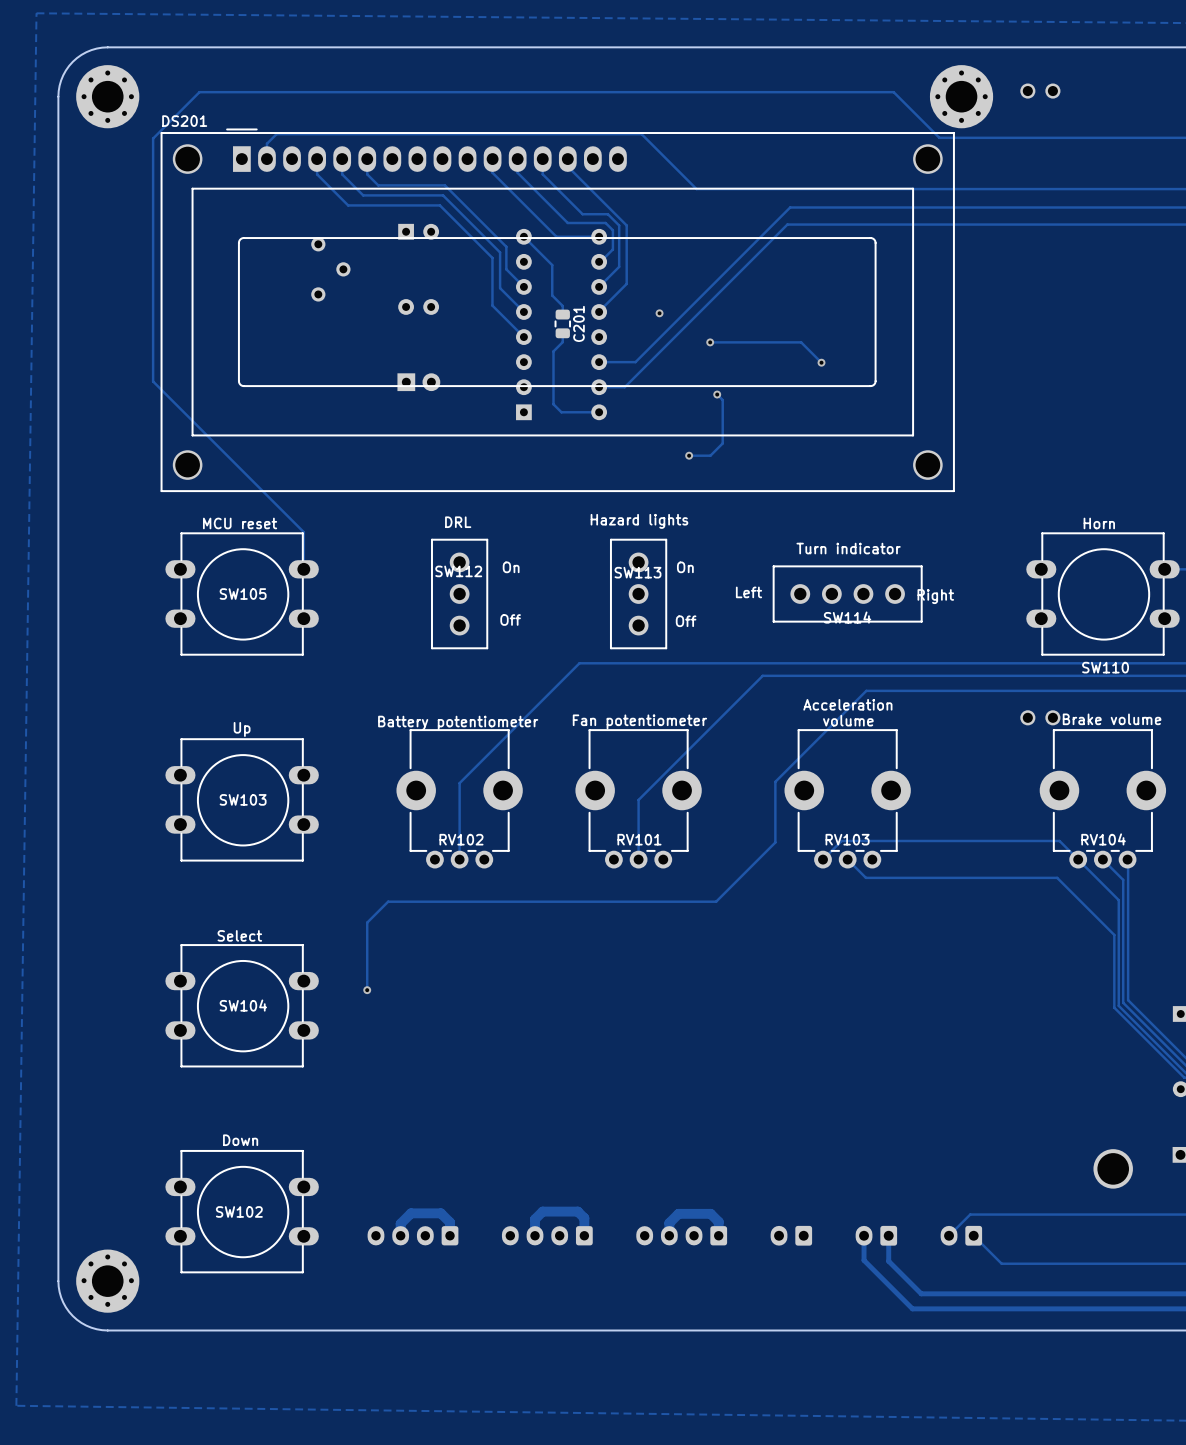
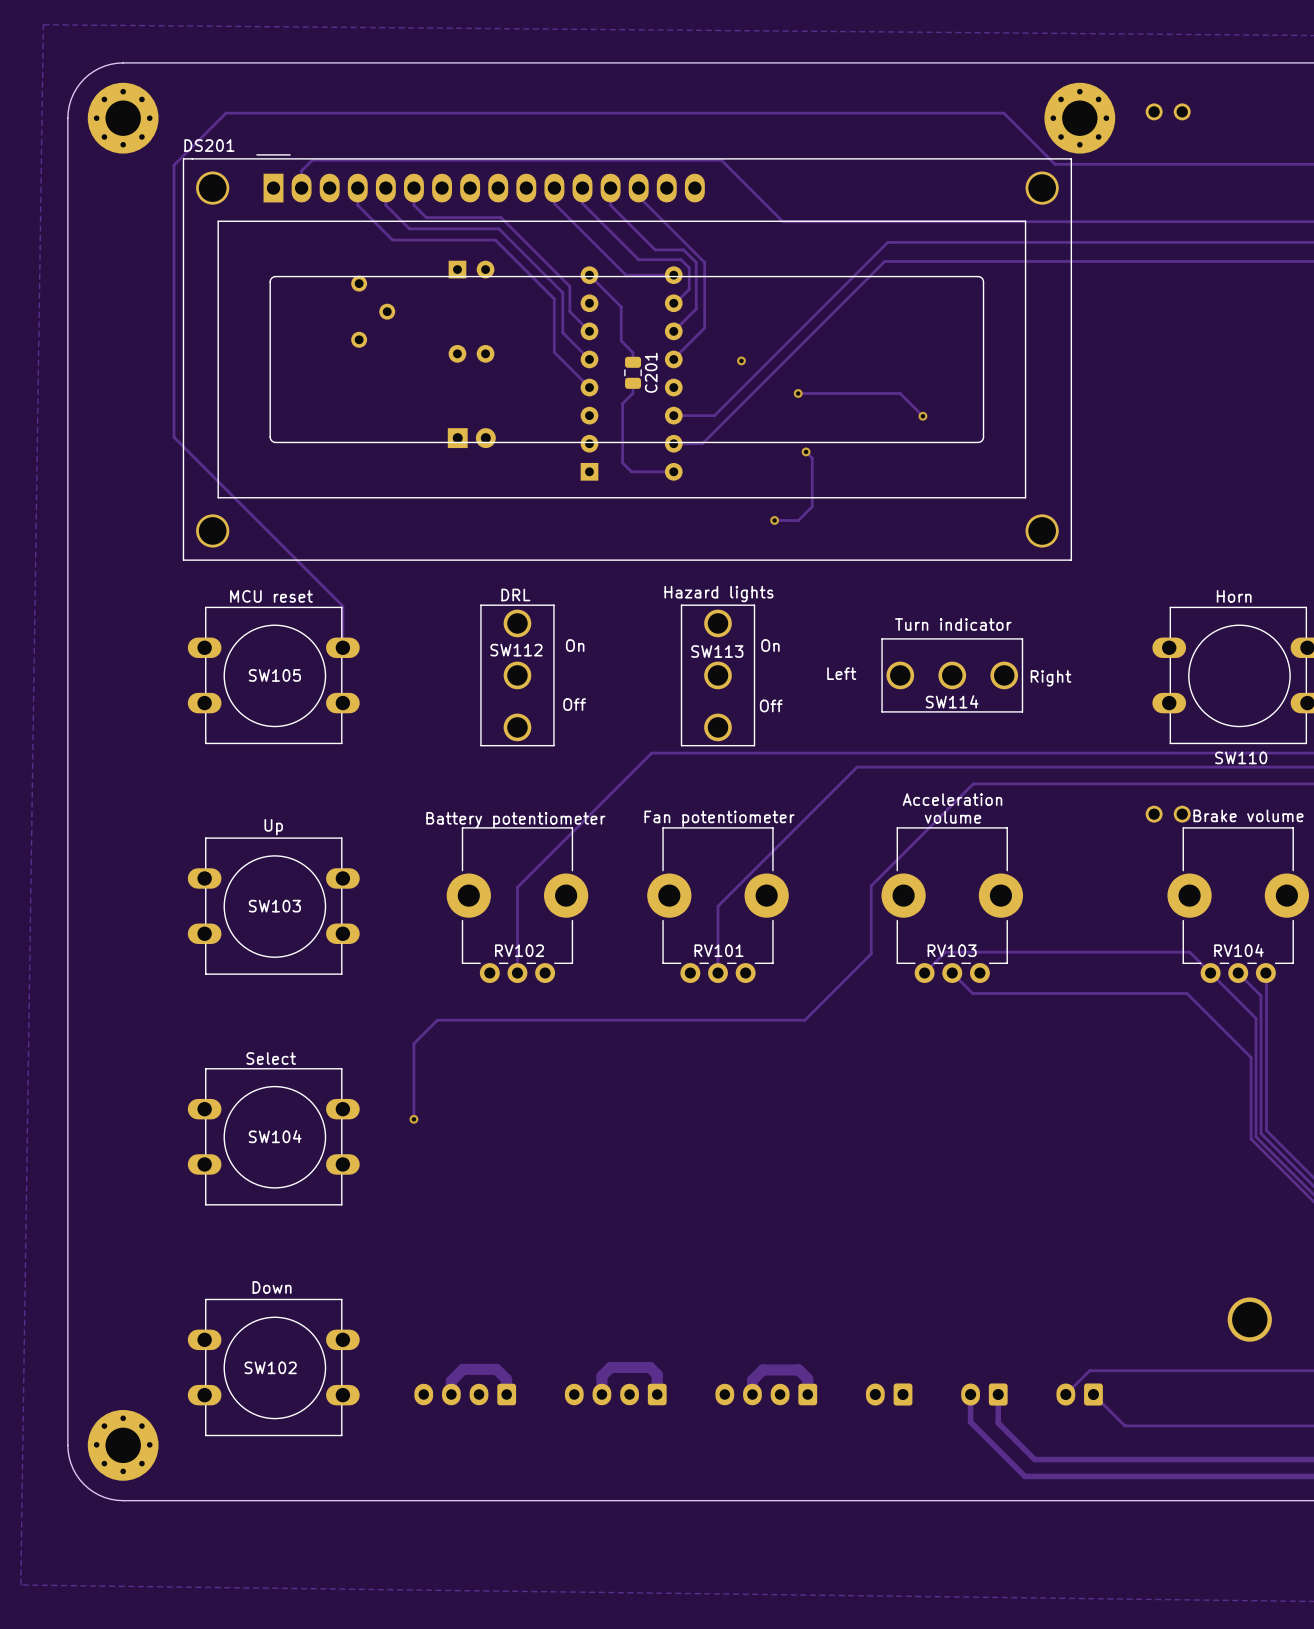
SW112 footprint: [431, 539, 488, 649] -> [480, 604, 555, 747]
SW113 footprint: [610, 539, 667, 649] -> [680, 604, 756, 747]
SW114 footprint: [773, 565, 923, 623] -> [881, 638, 1024, 713]

